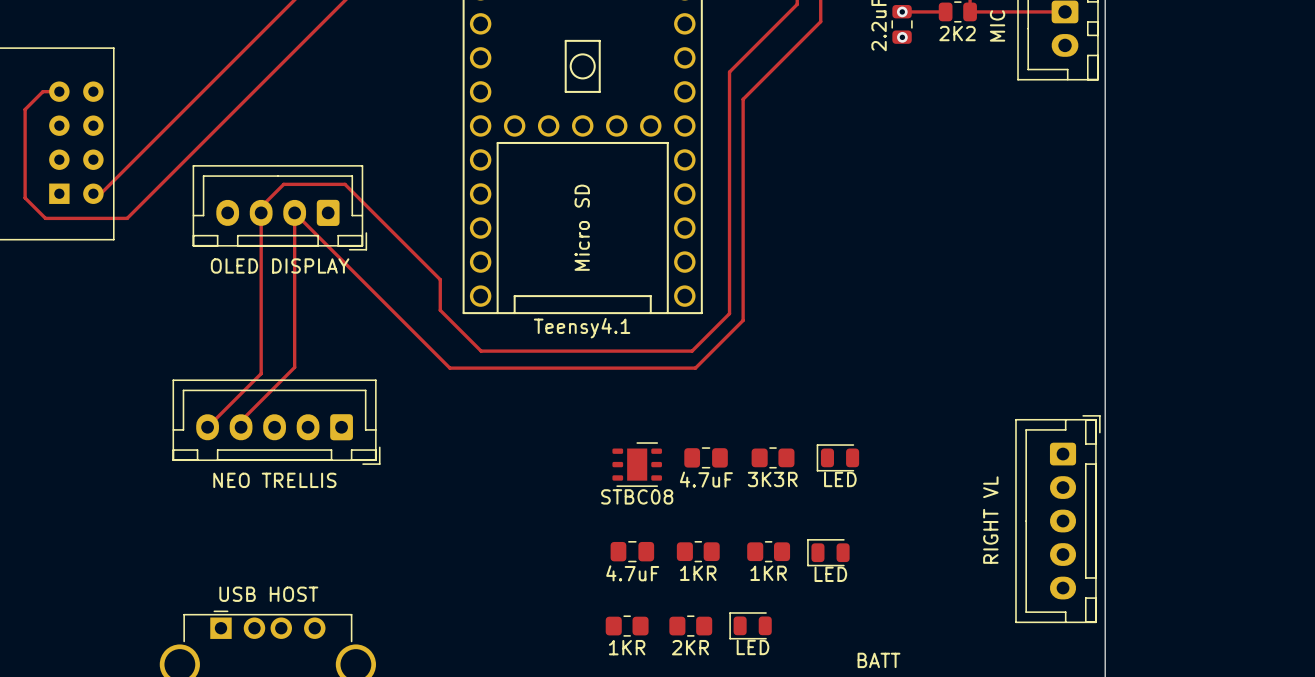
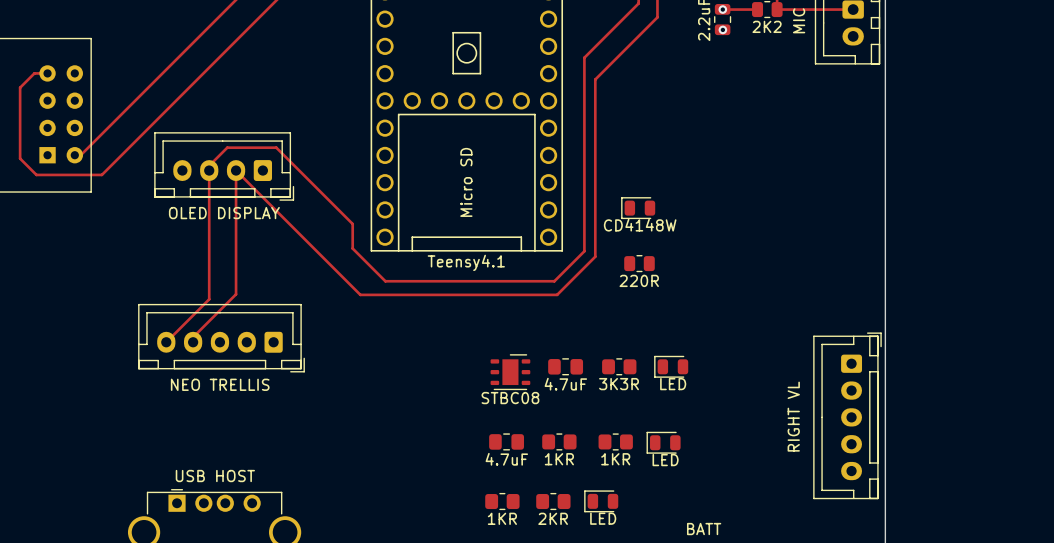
part: none -> CD4148W (638, 208)
part: none -> 220R (639, 263)

